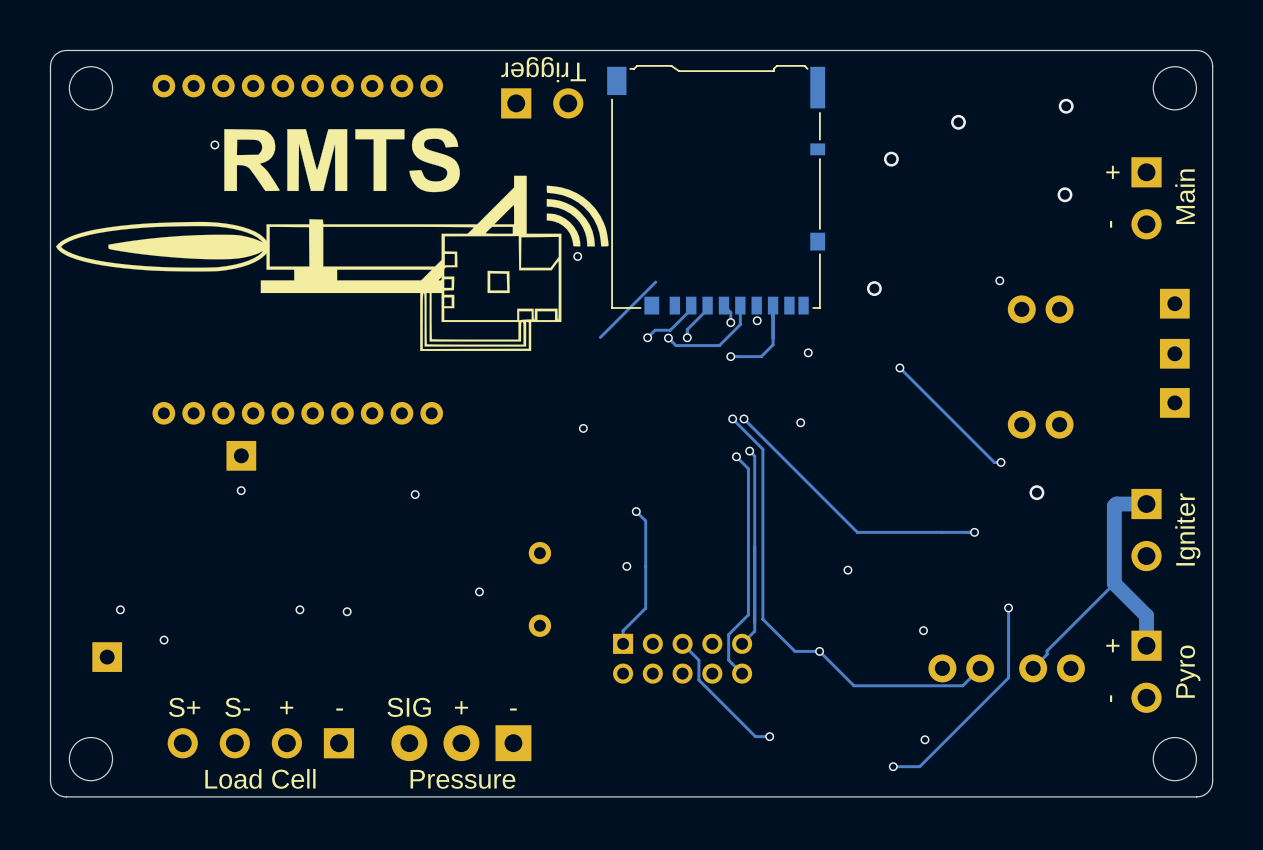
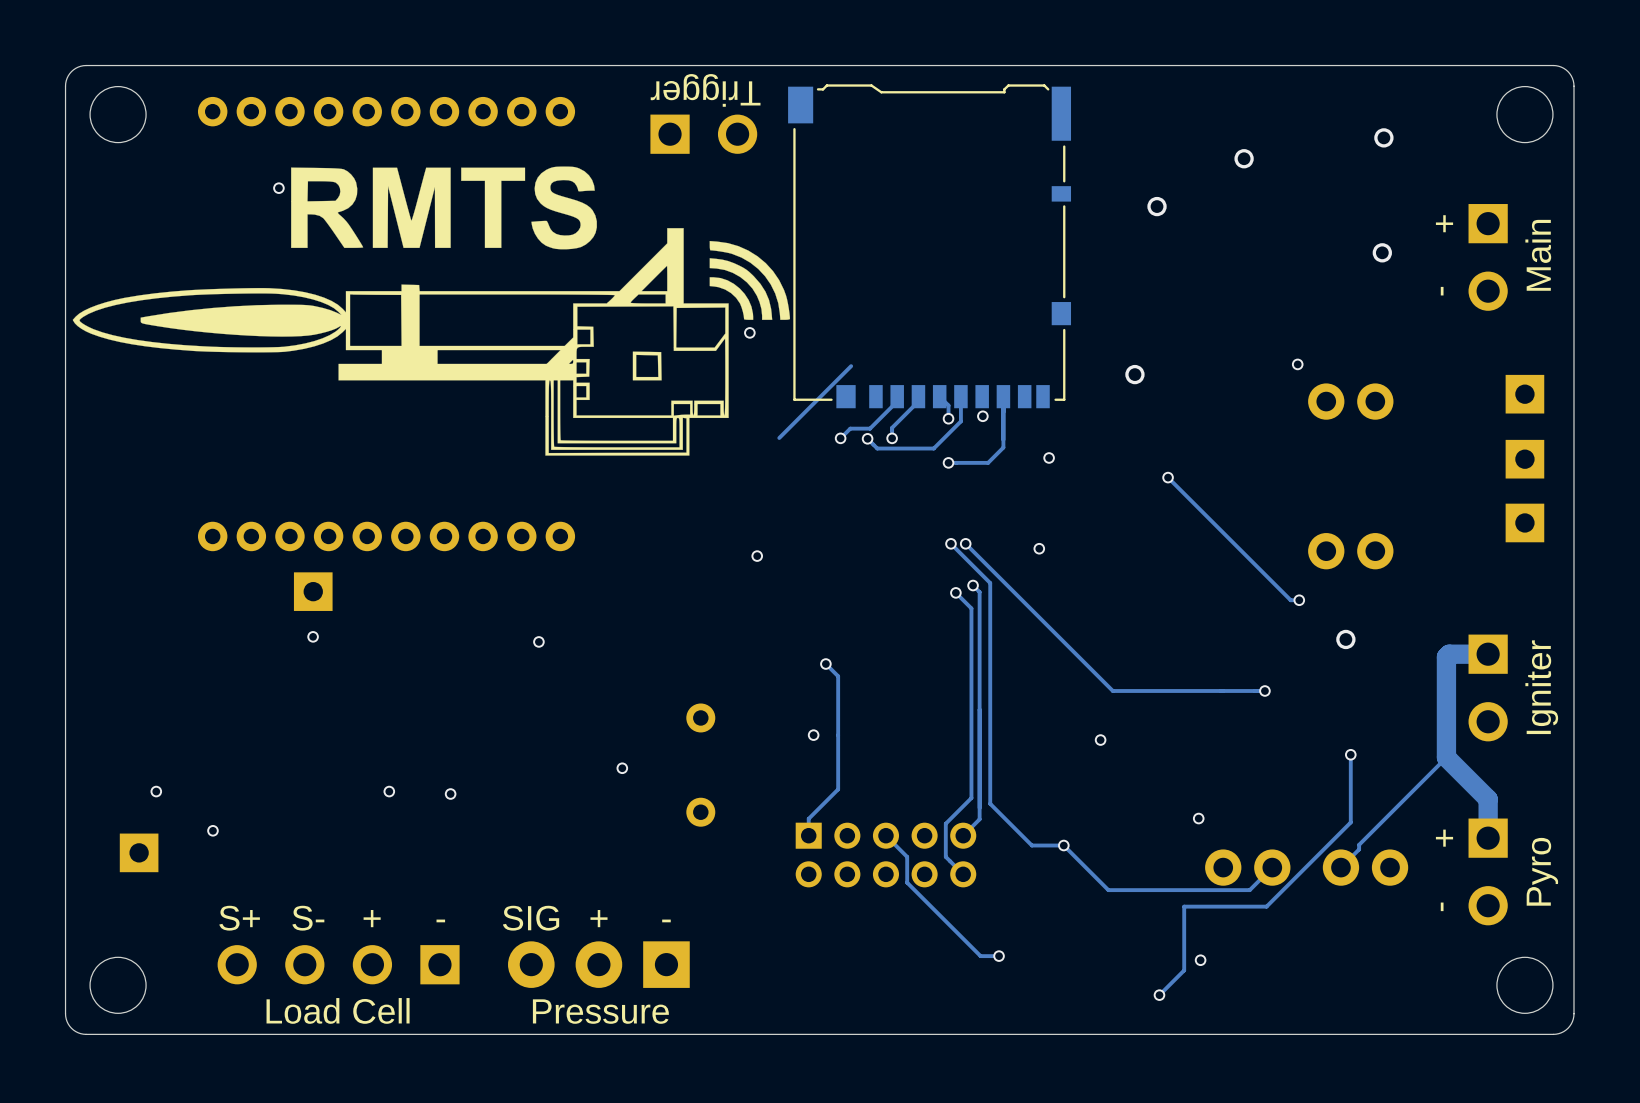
track: (1008, 607) (1008, 677) (919, 766) (893, 766) -> (1350, 754) (1350, 822) (1266, 906) (1184, 906) (1184, 970) (1159, 995)
via position: (1008, 607) -> (1350, 754)

